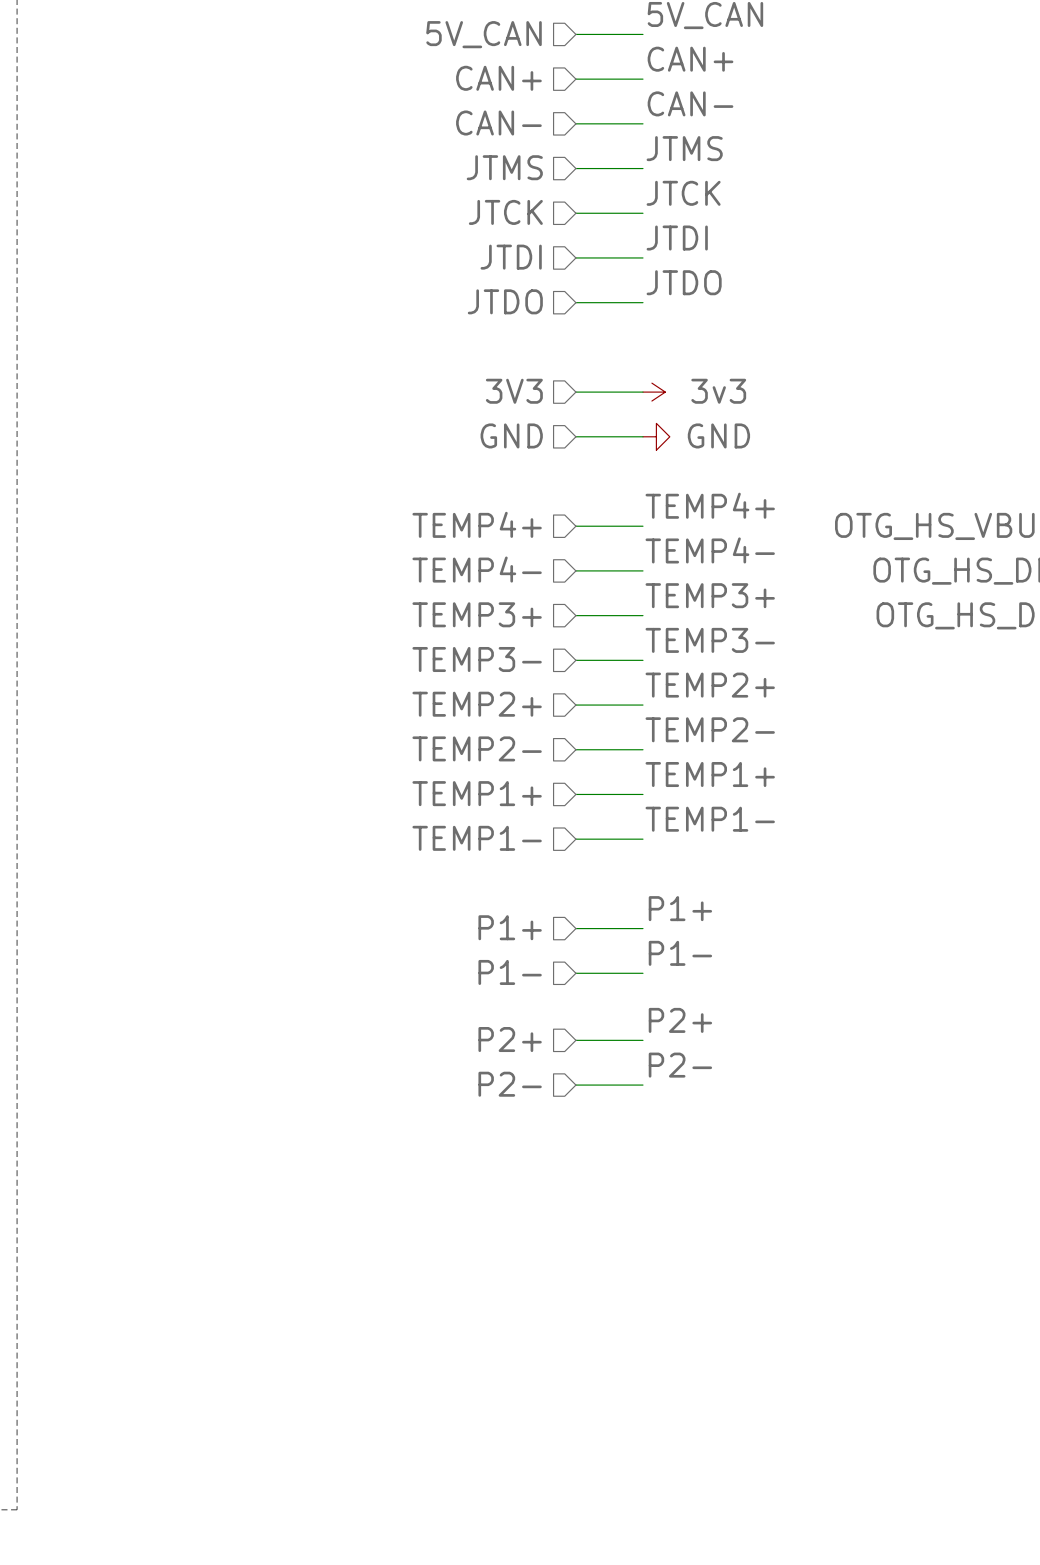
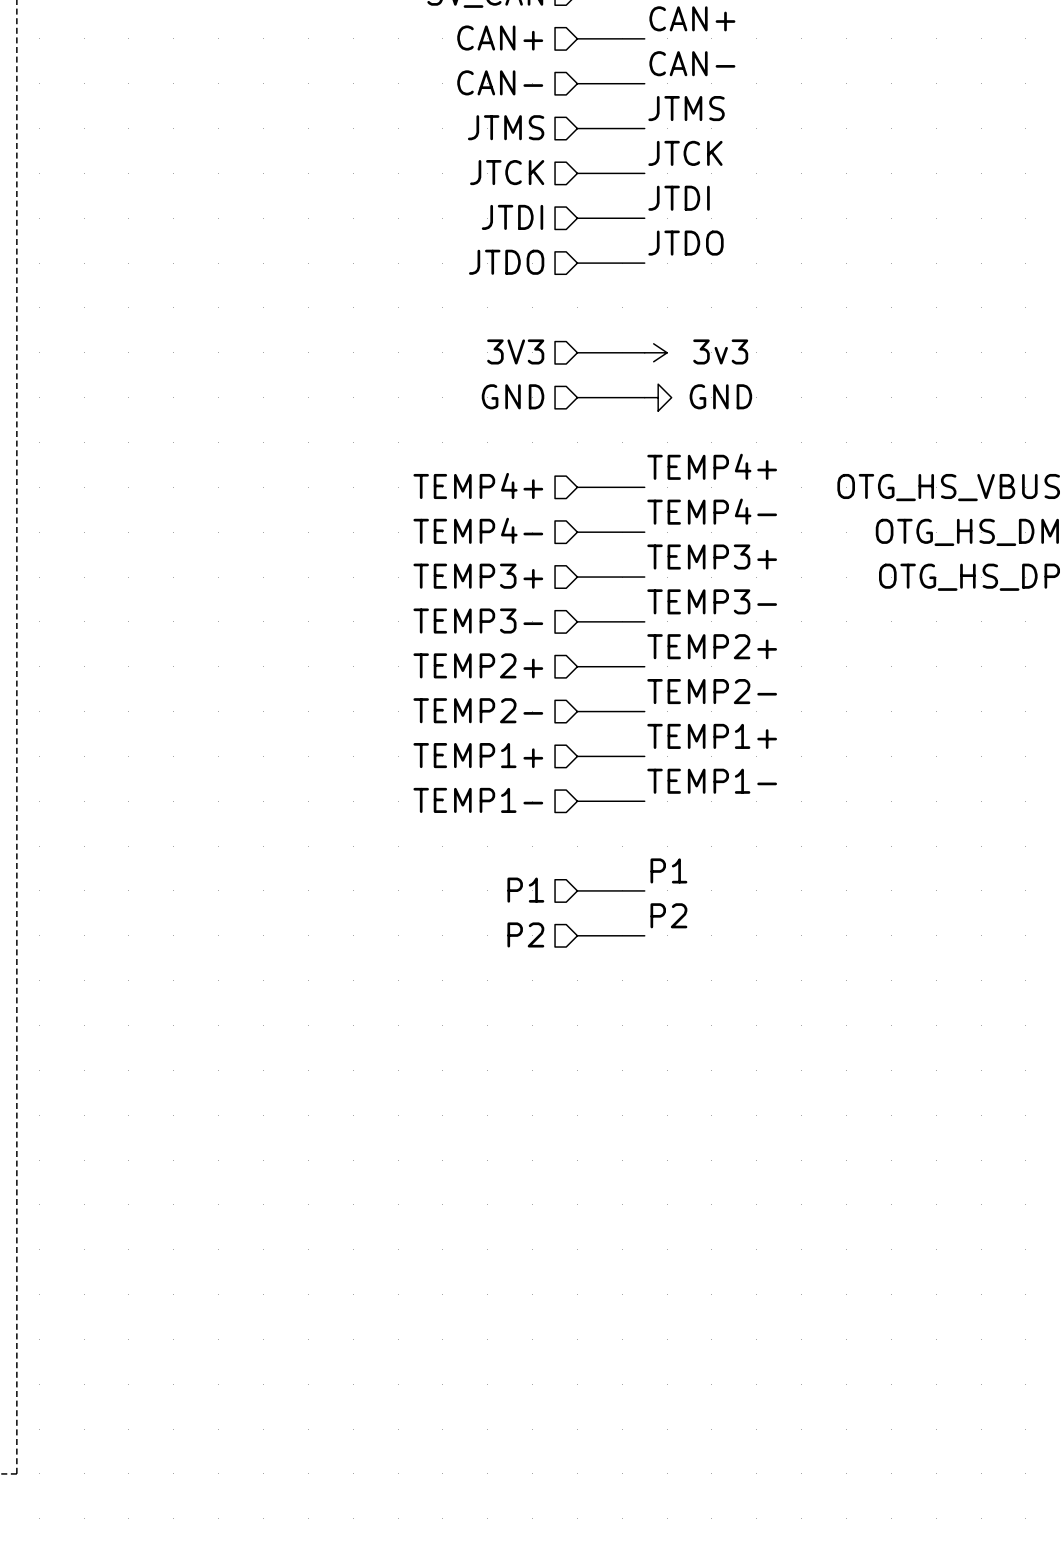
label: P1+ (680, 908) -> P1 (668, 870)
hierarchical label: P1+ (510, 927) -> P1 (525, 890)
label: P1- (680, 953) -> P2 (668, 915)
hierarchical label: P1- (510, 972) -> P2 (525, 934)
label: P2+ (680, 1020) -> none
hierarchical label: P2+ (510, 1039) -> none
wire: (575, 1040) (642, 1040) -> none
label: P2- (680, 1065) -> none
hierarchical label: P2- (510, 1084) -> none
wire: (575, 1085) (642, 1085) -> none

